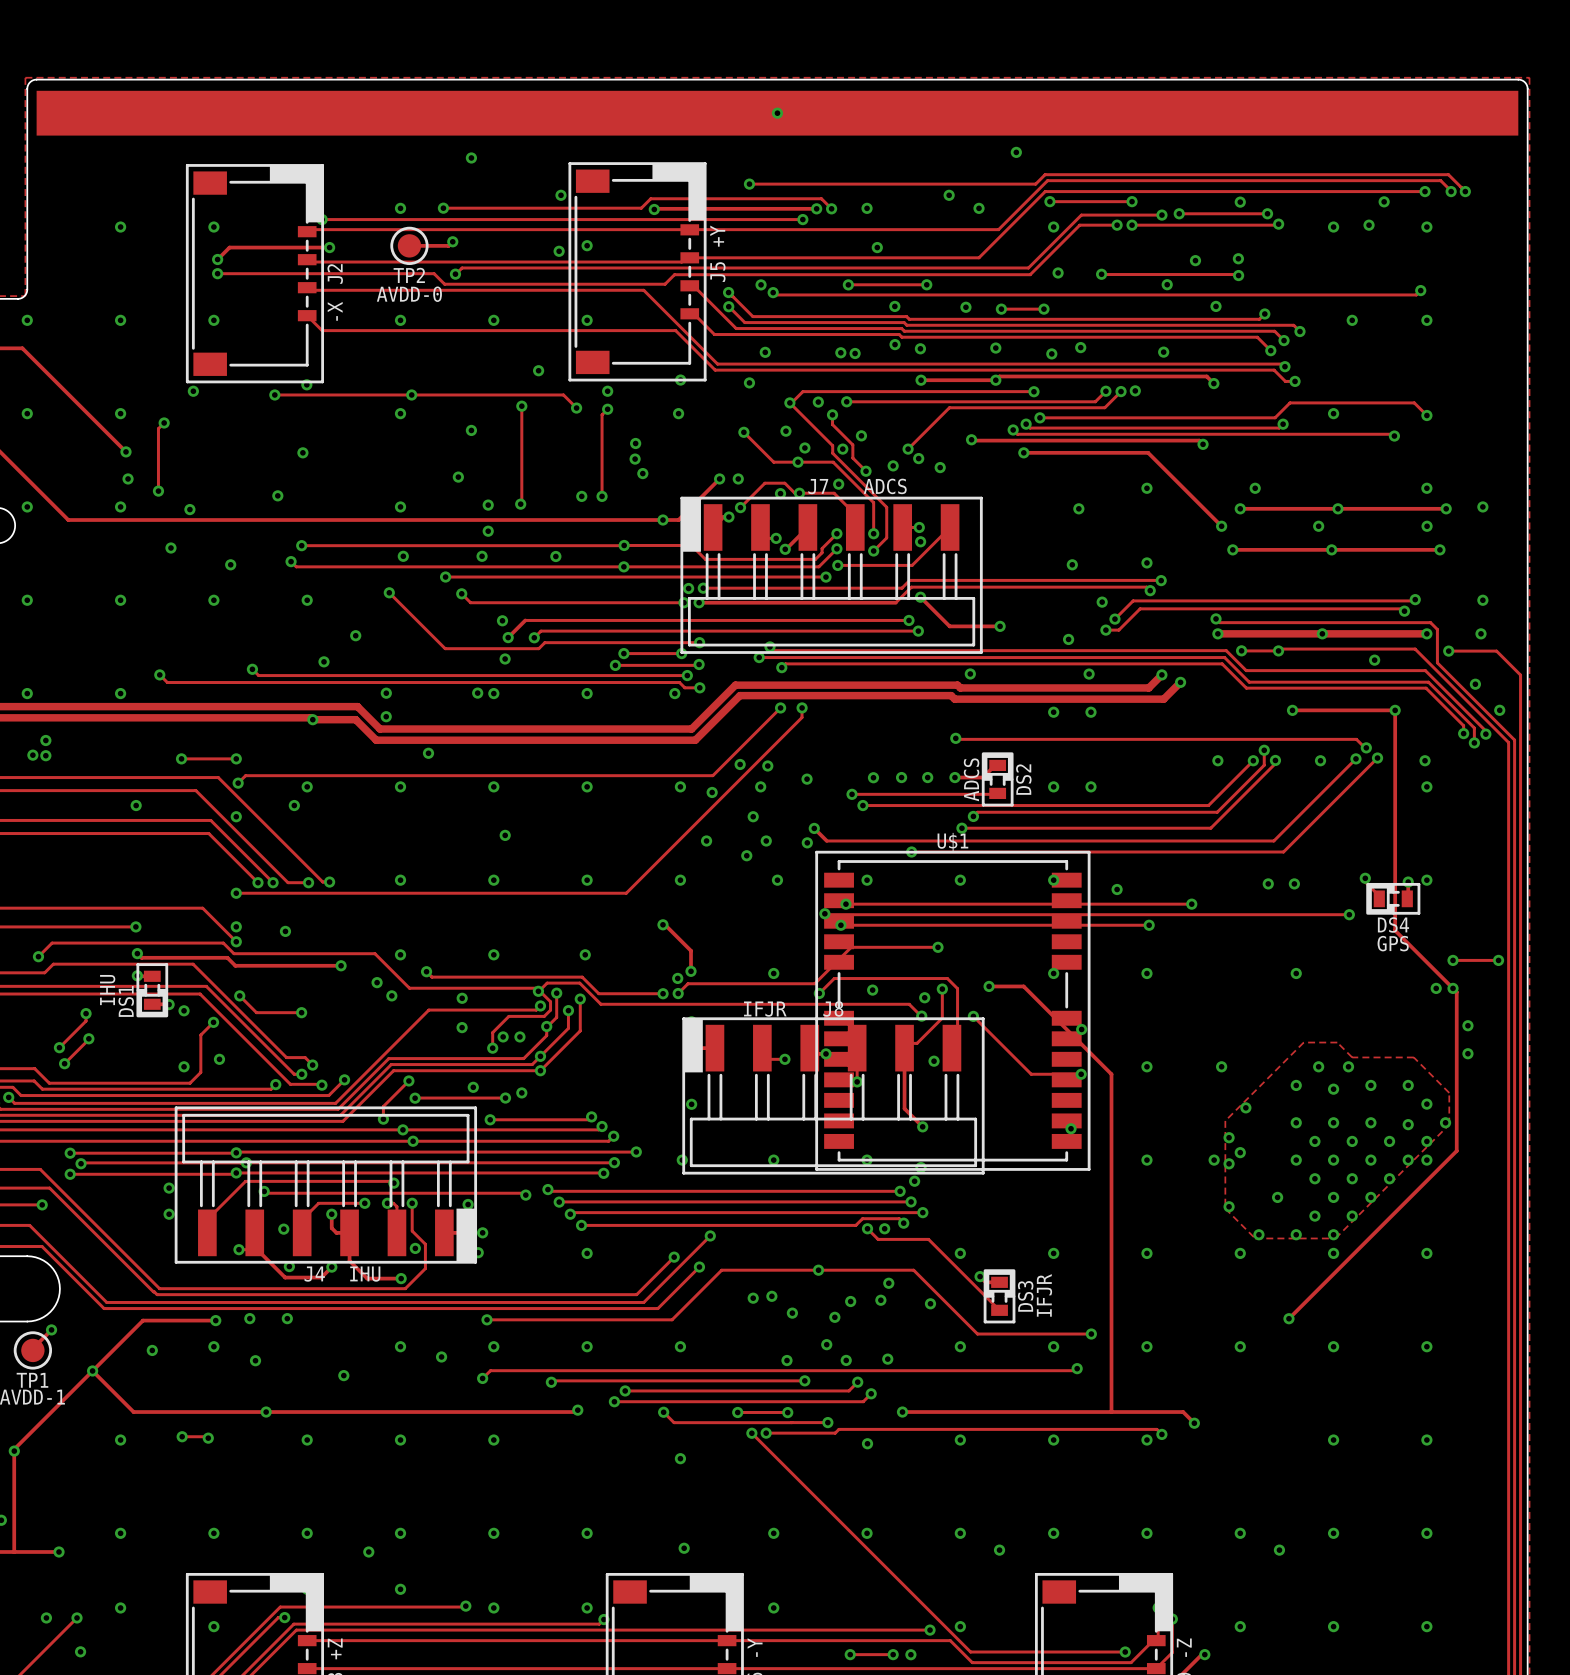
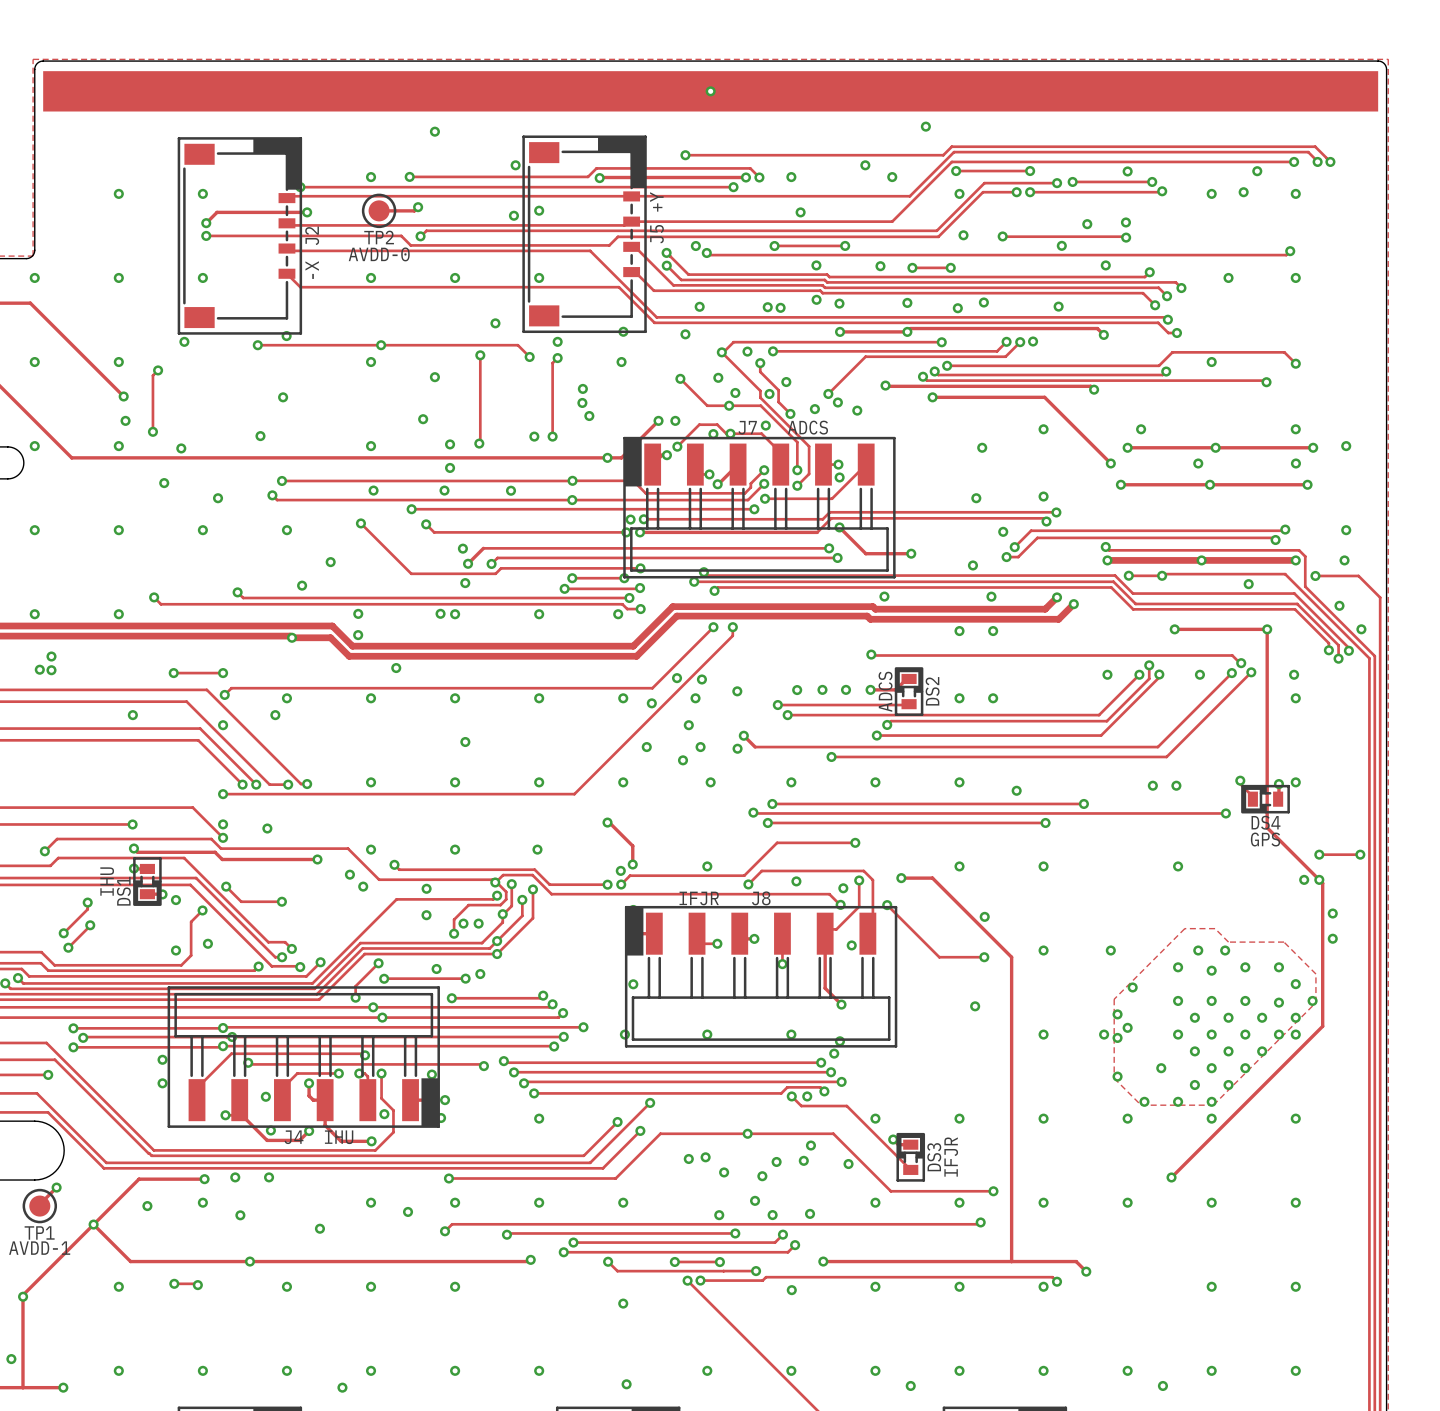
U$1: (952, 1010) -> none

